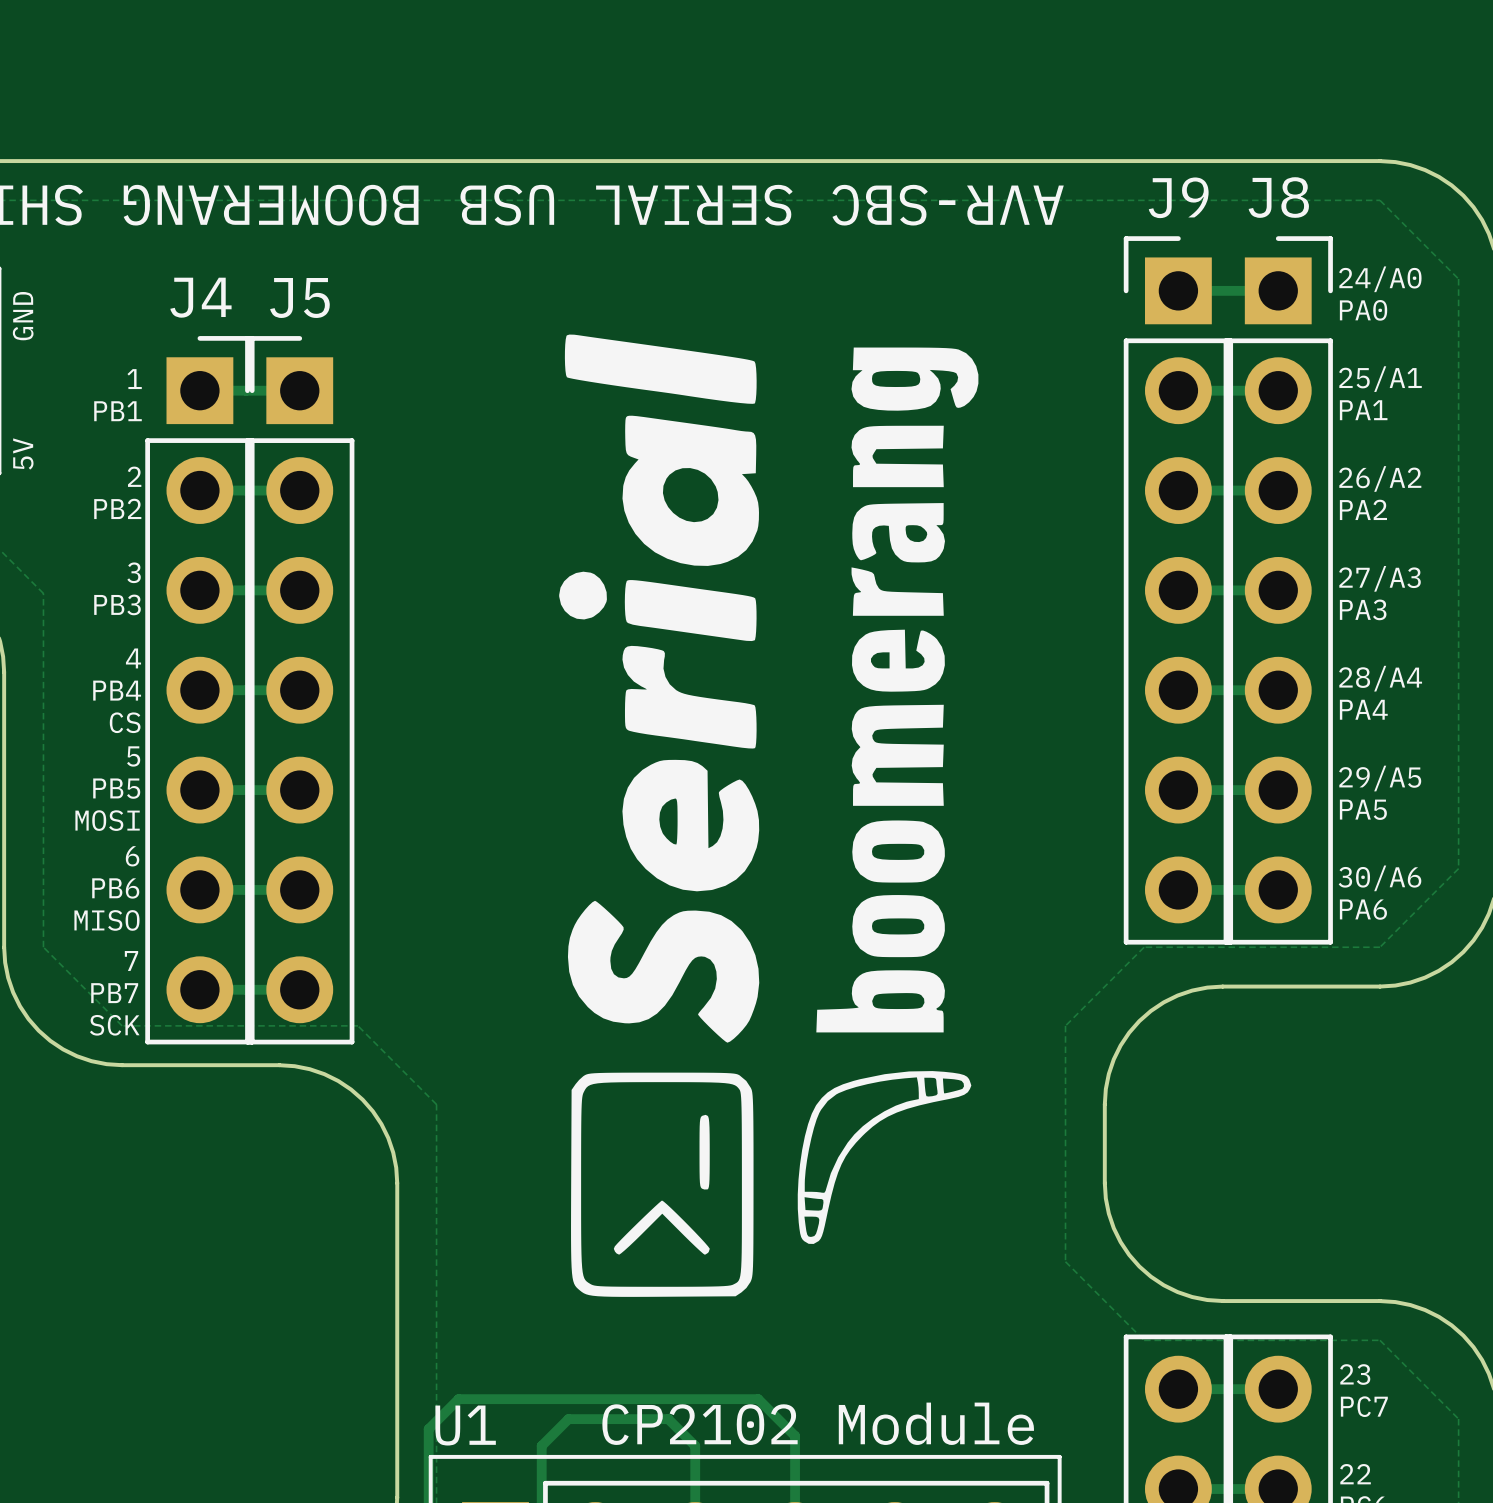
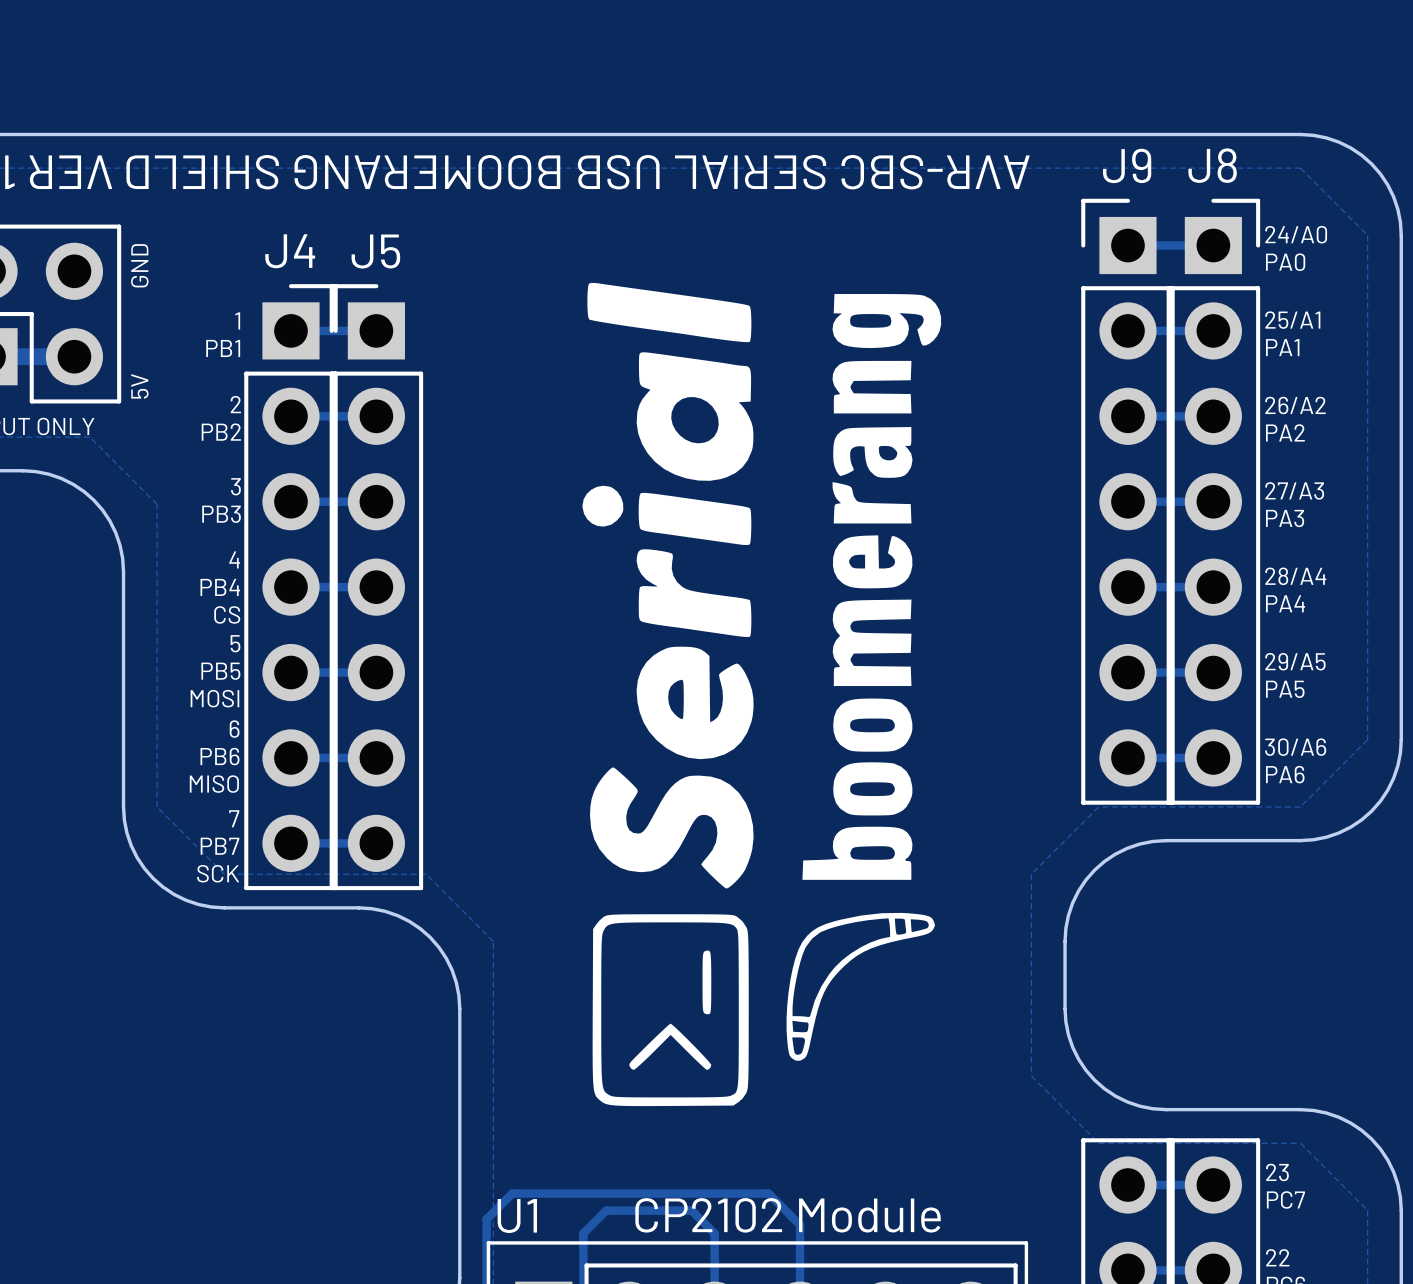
drawing position: (768, 815) -> (761, 694)

